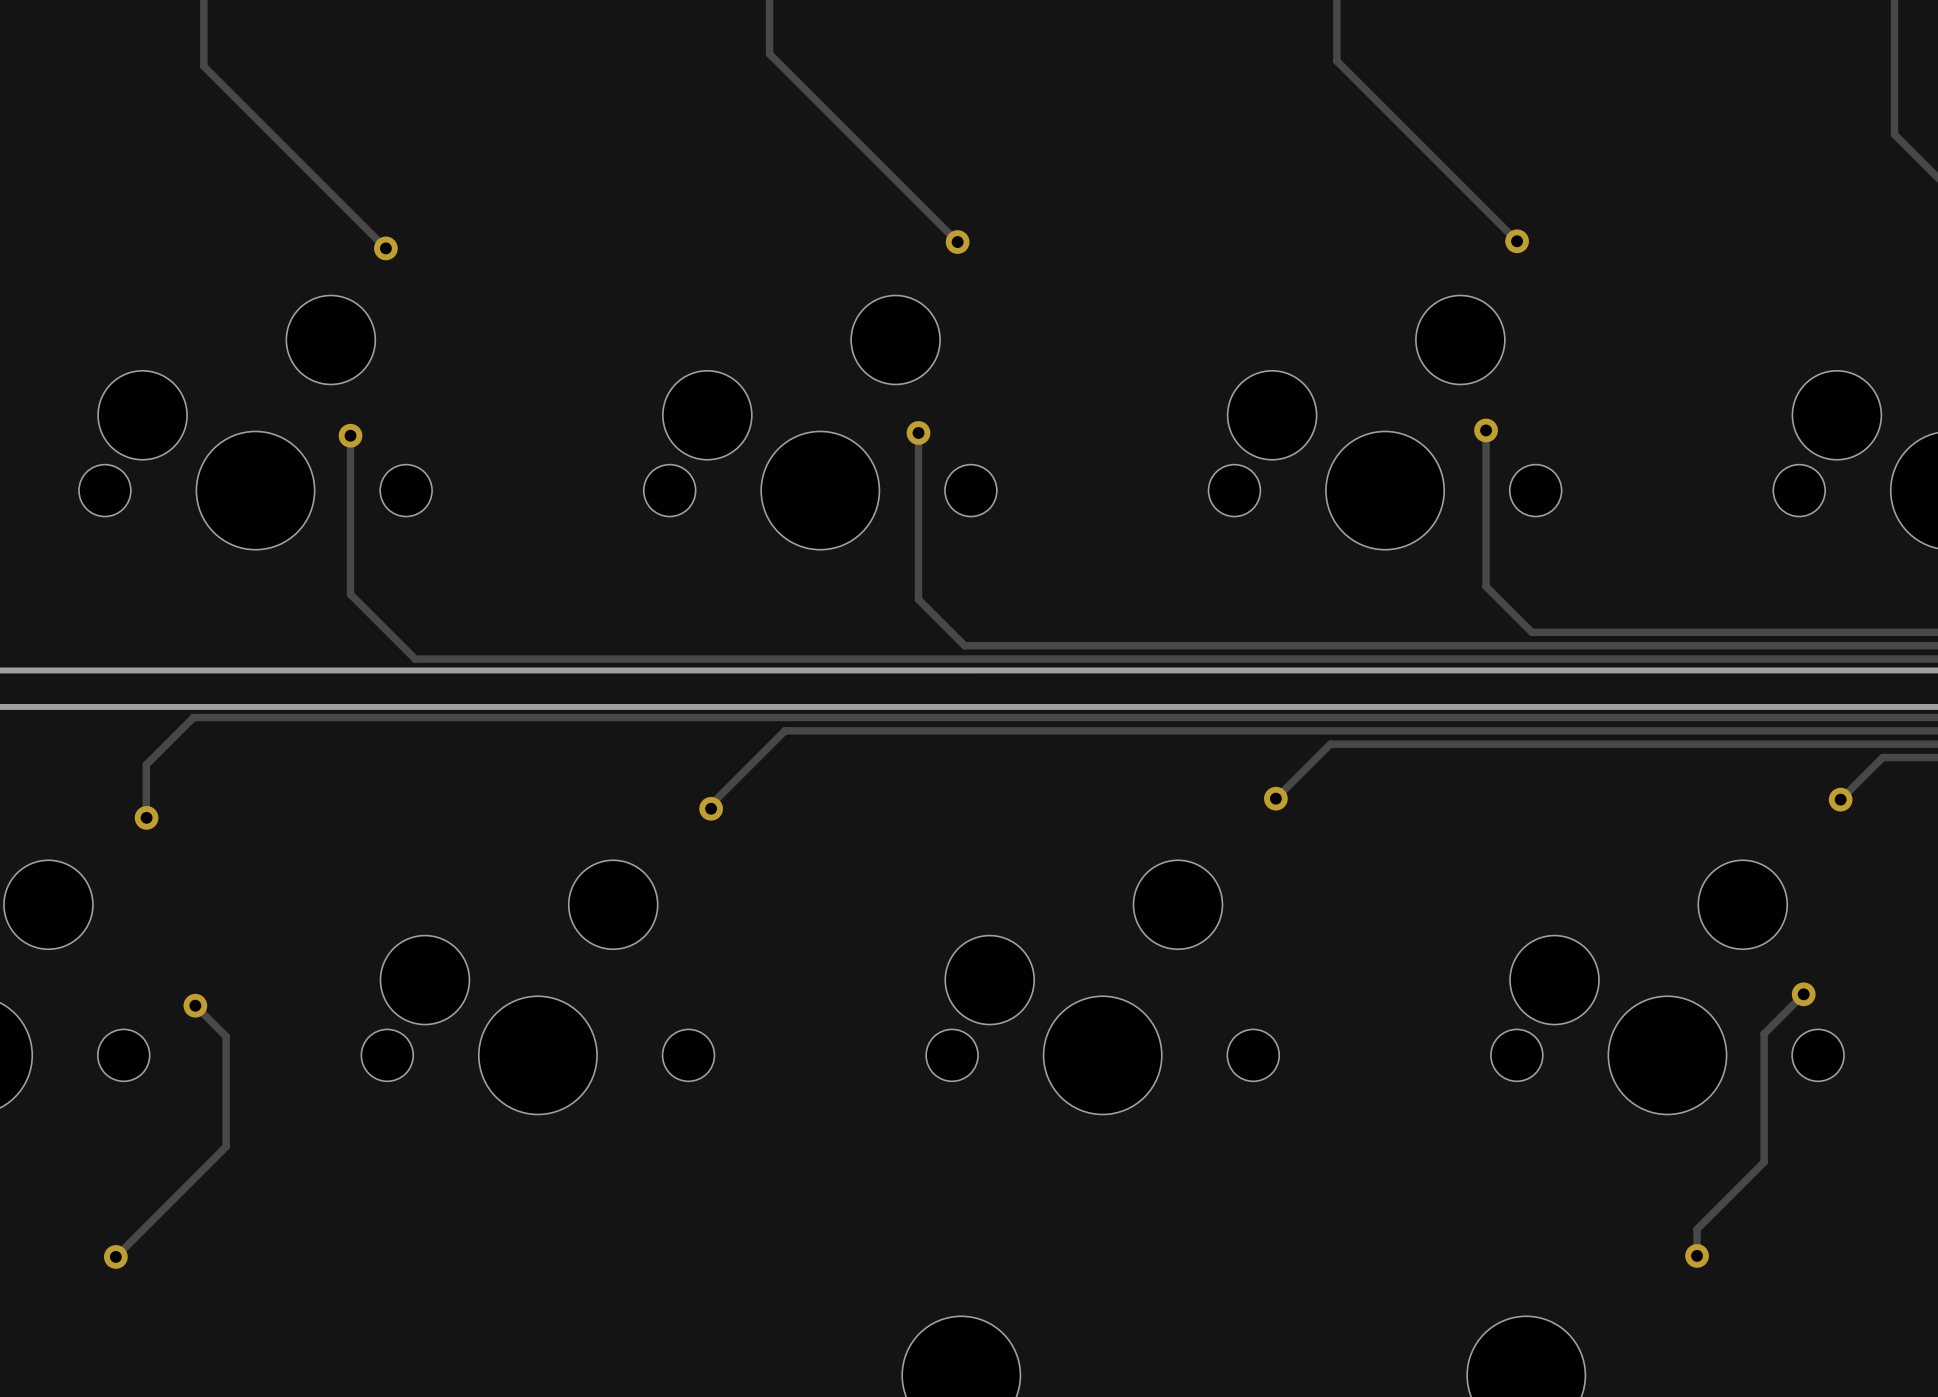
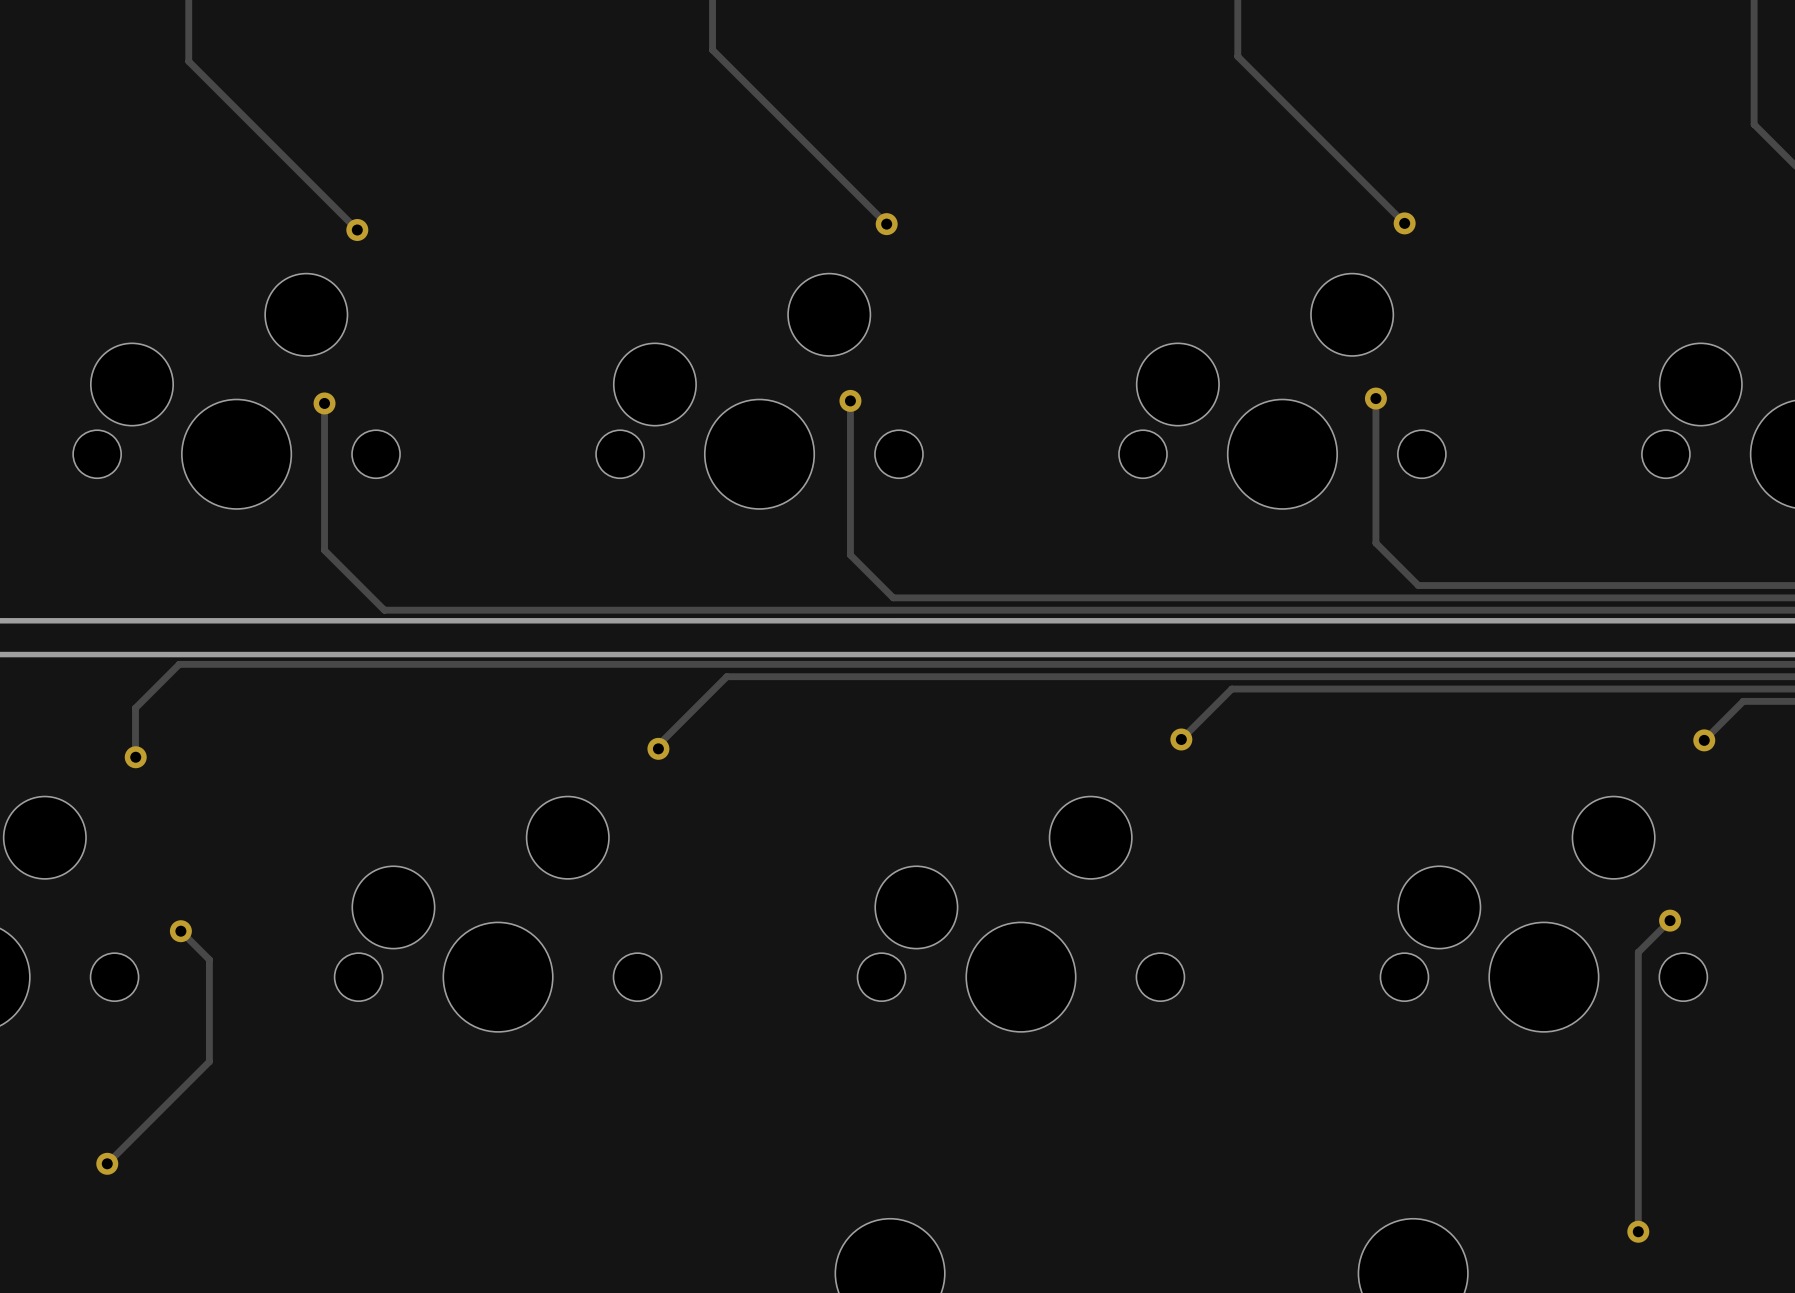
track: (1769, 1028) (1764, 1033) (1764, 1162) (1697, 1229) (1697, 1255) -> (1638, 952) (1638, 1231)
via position: (1697, 1255) -> (1638, 1231)

